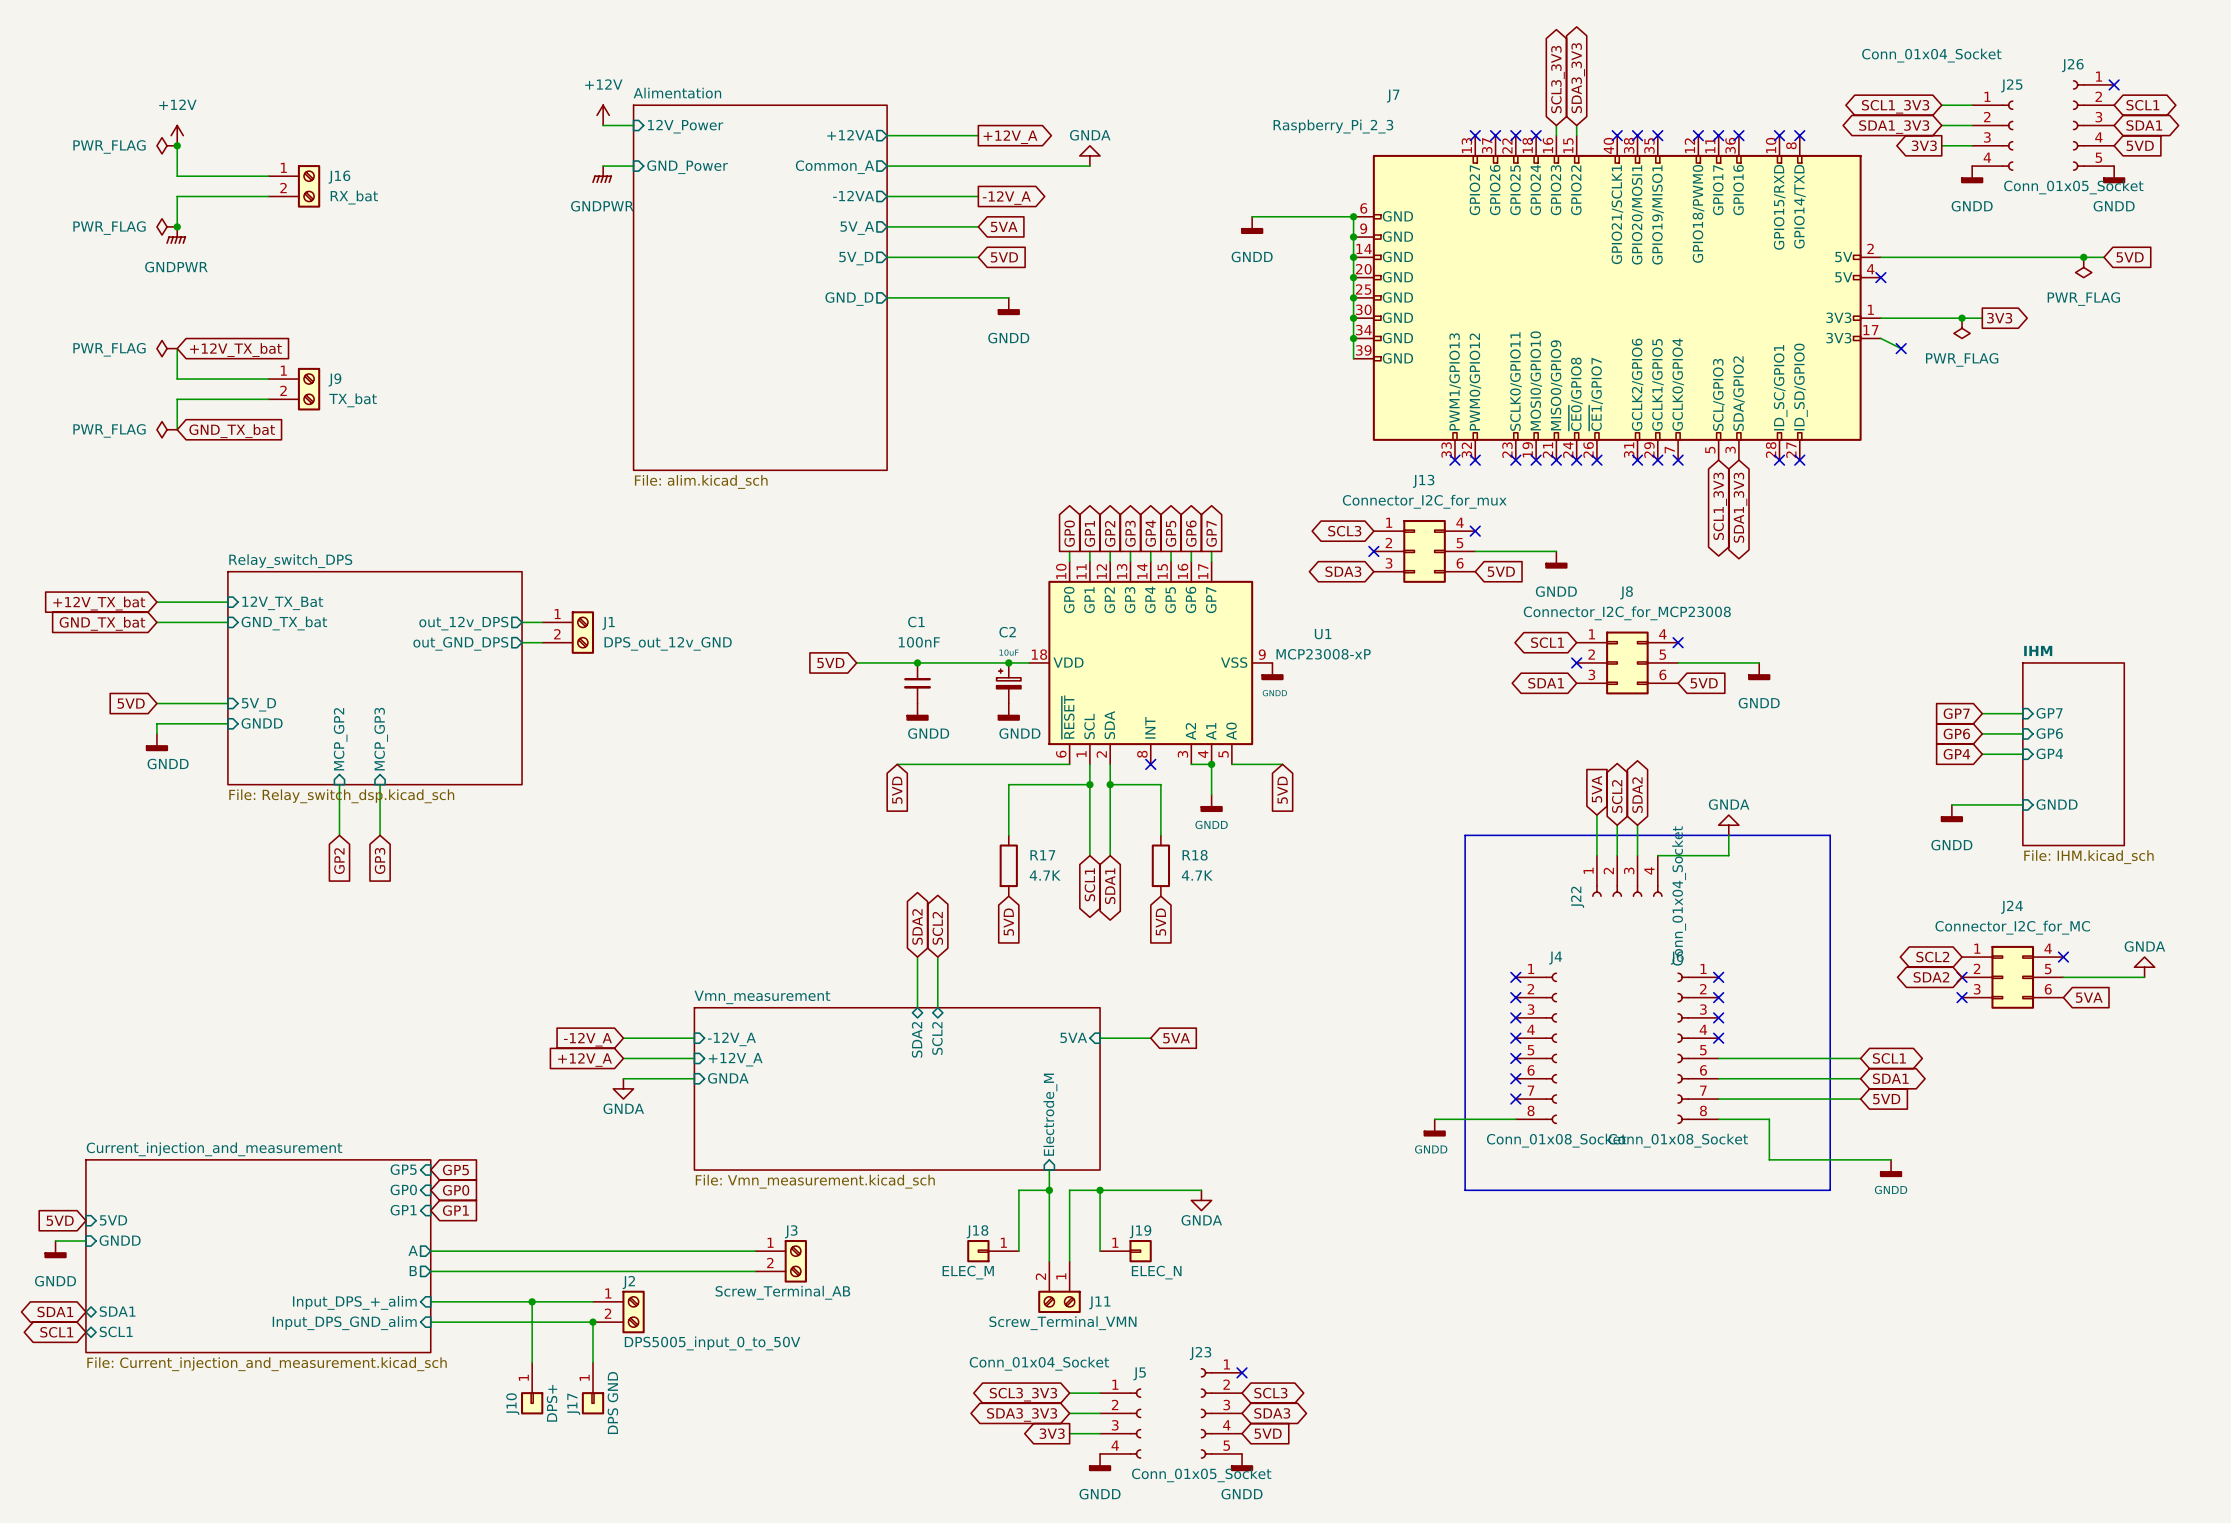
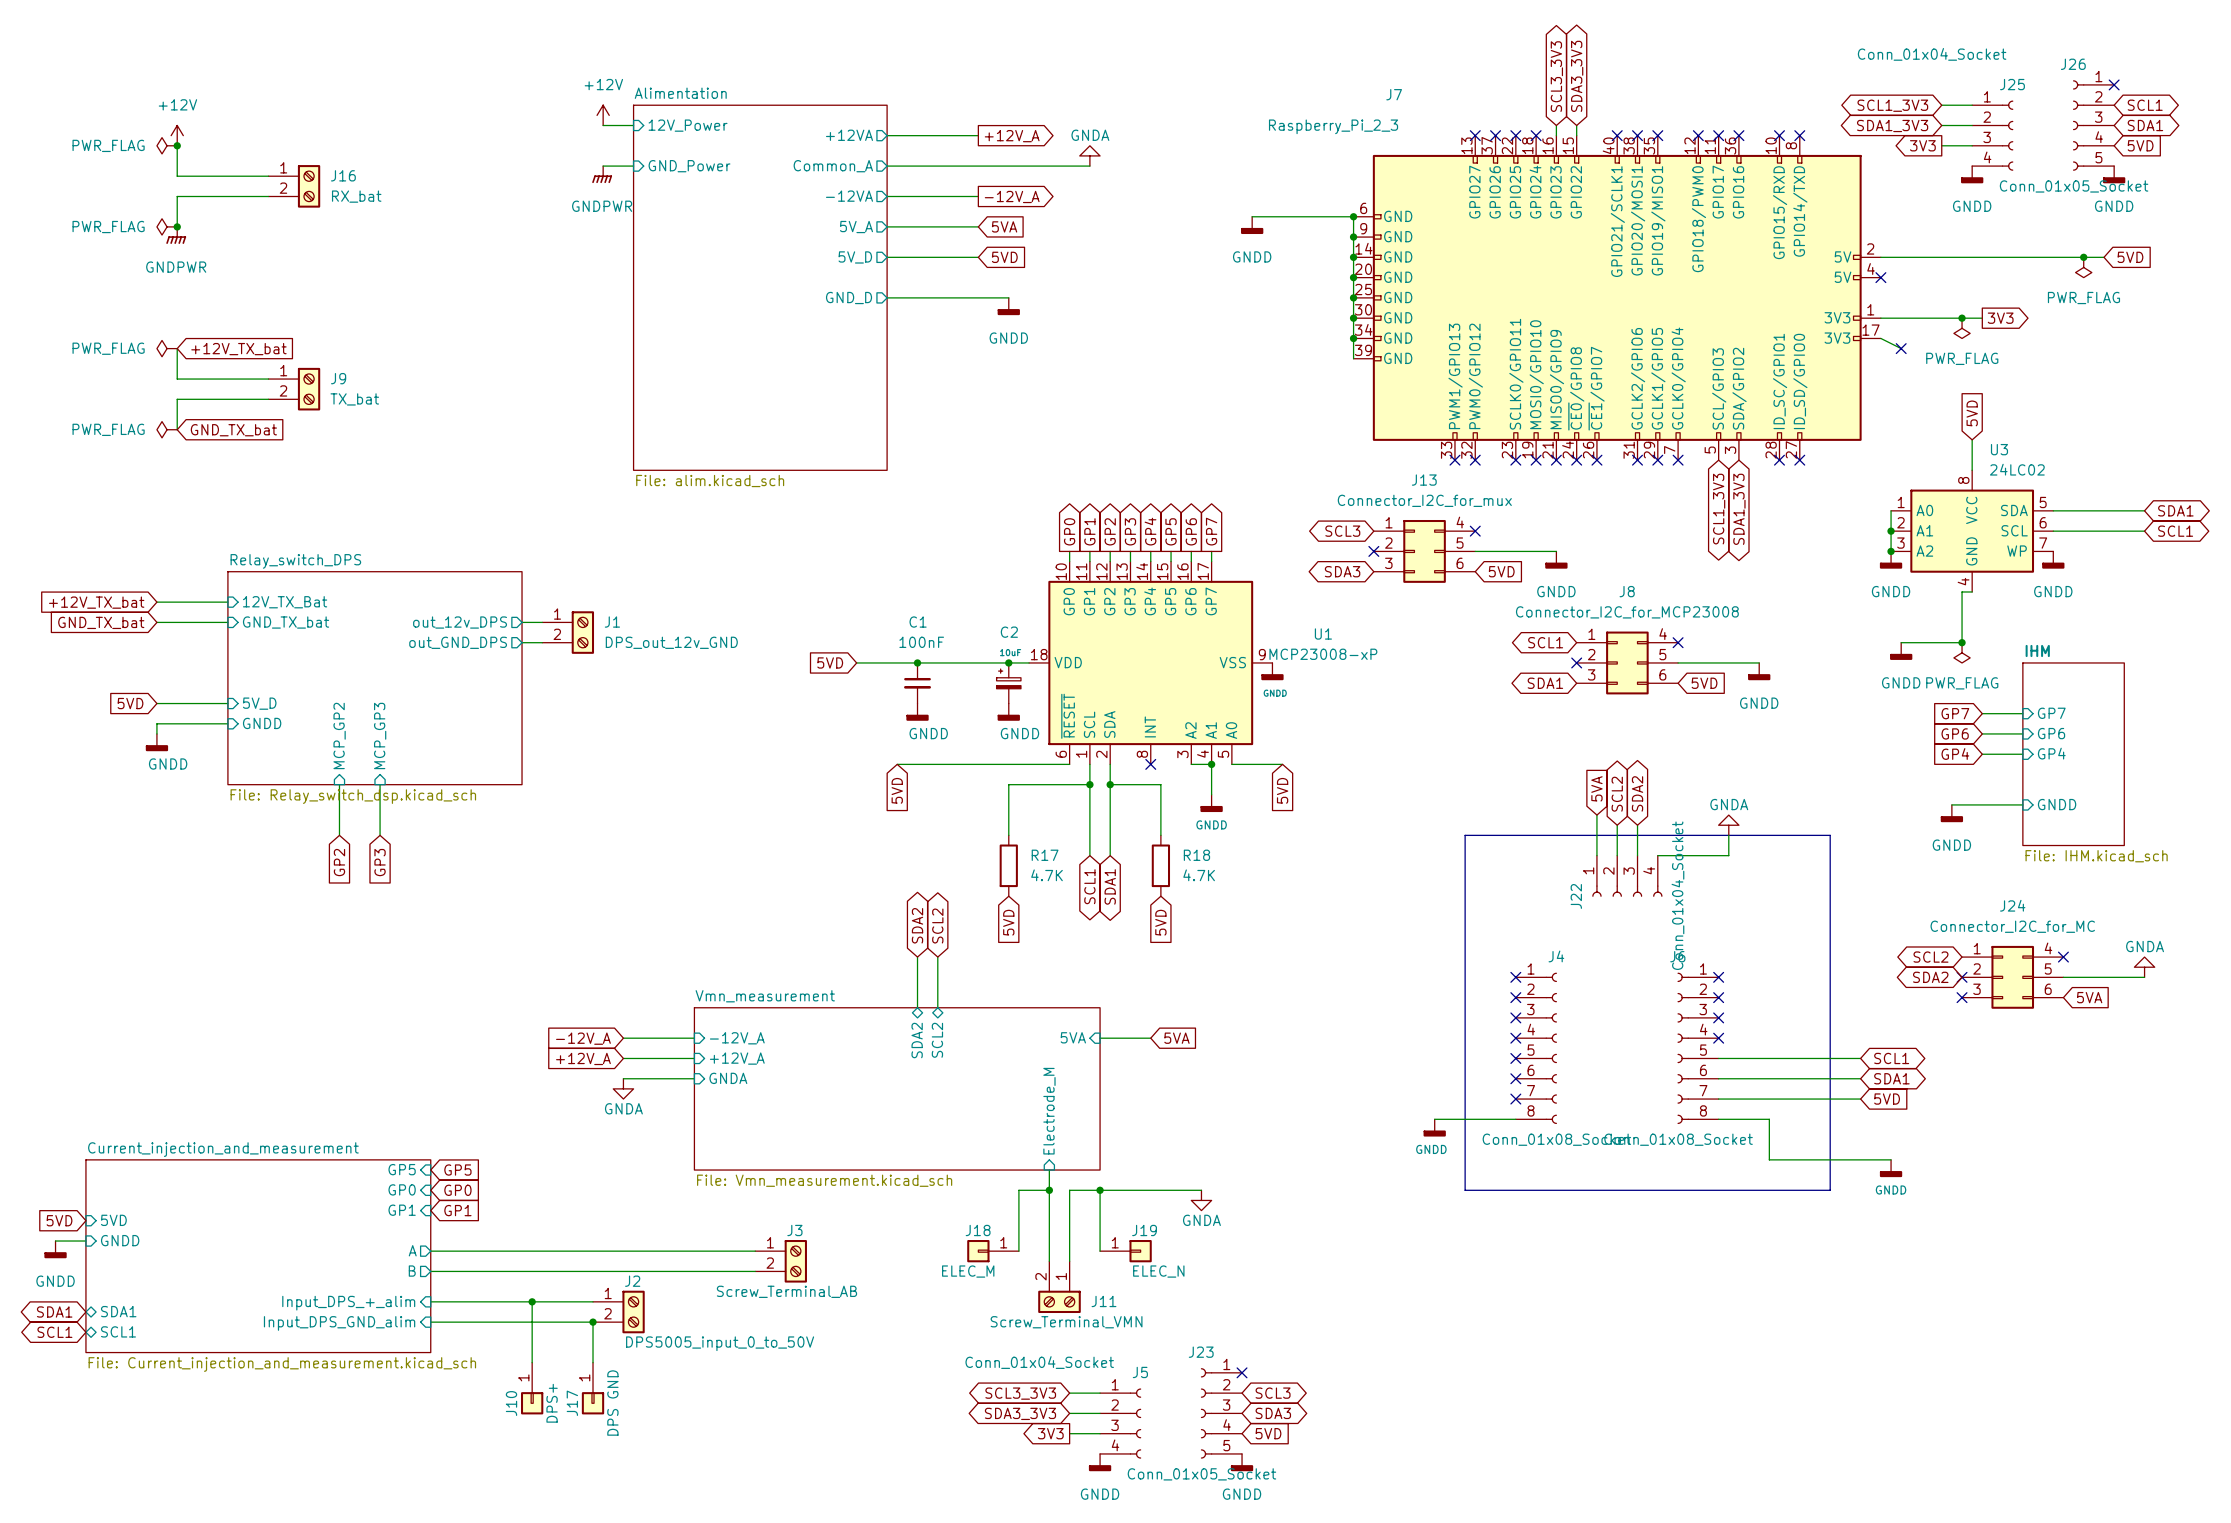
global label: none -> 5VD (1972, 413)
wire: none -> (1972, 439) (1972, 470)
wire: none -> (1891, 510) (1891, 551)
wire: none -> (2053, 510) (2144, 510)
global label: none -> SDA1 (2175, 510)
junction: none -> (1891, 531)
U3: none -> 24LC02 (1972, 531)
wire: none -> (2053, 531) (2144, 531)
global label: none -> SCL1 (2175, 531)
junction: none -> (1891, 551)
power symbol: none -> GNDD (1891, 560)
power symbol: none -> GNDD (2053, 560)
wire: none -> (1972, 591) (1962, 591) (1962, 642) (1901, 642)
junction: none -> (1962, 642)
power symbol: none -> GNDD (1901, 651)
power symbol: none -> PWR_FLAG (1962, 652)

